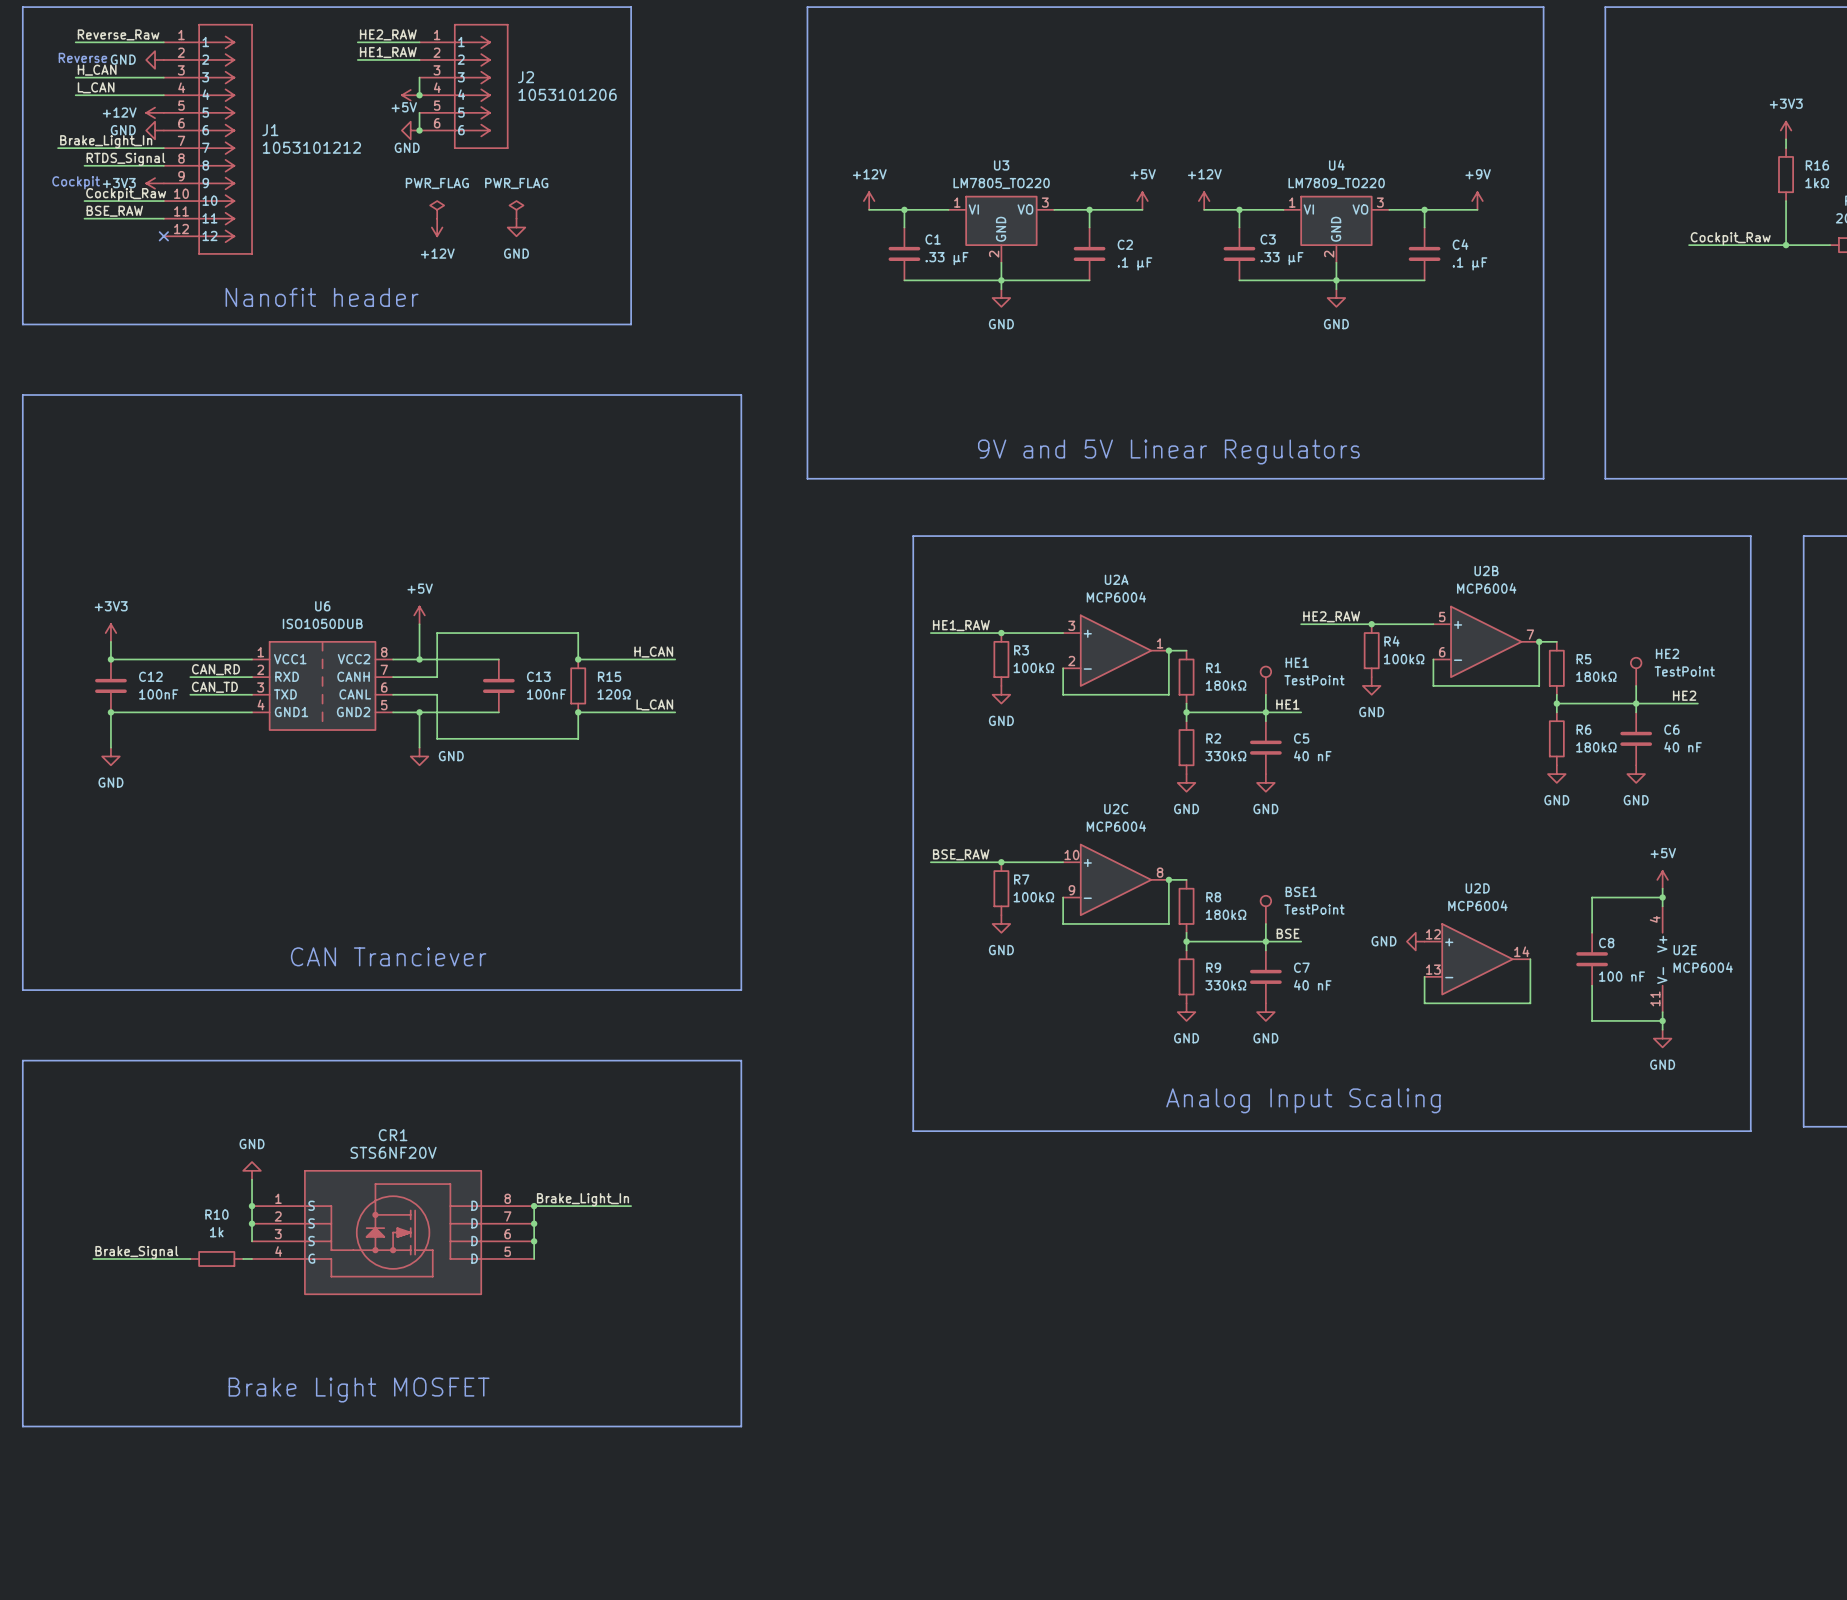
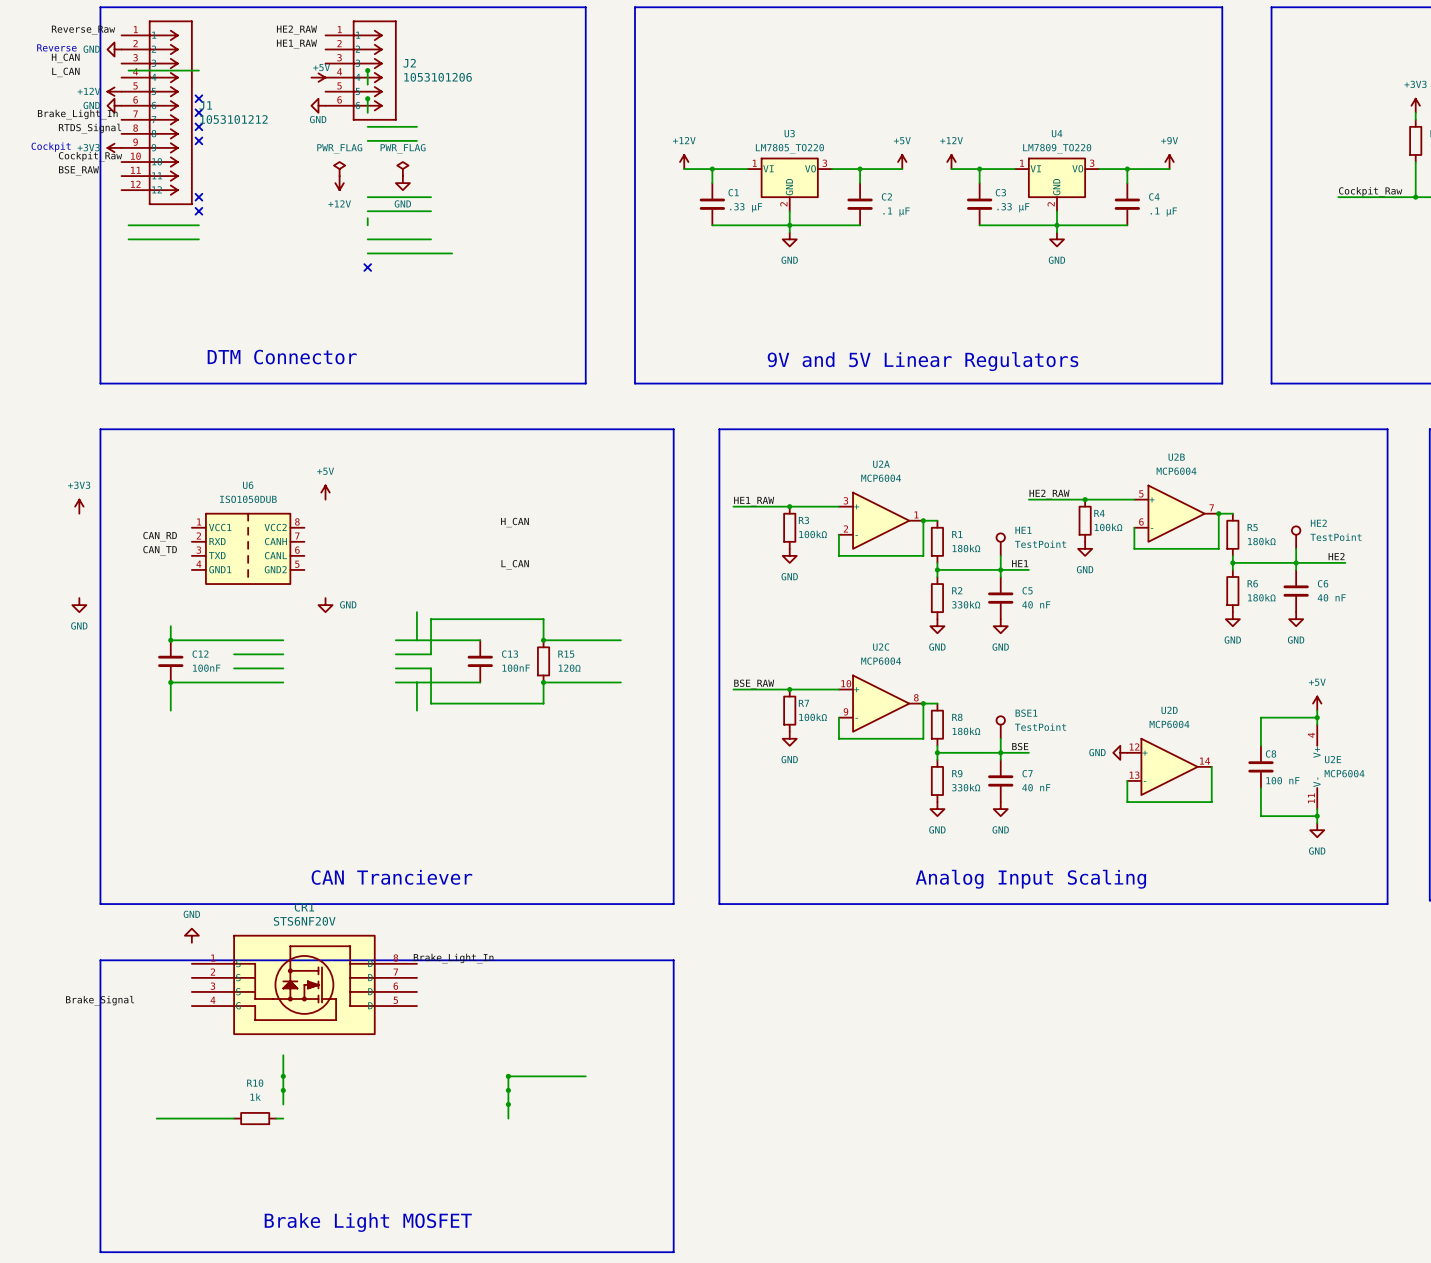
line: (137, 7) (22, 7) (22, 324) (631, 324) (631, 7) -> (100, 7) (100, 383) (585, 383) (585, 7) (494, 7)
wire: (75, 42) (163, 42) -> none
wire: (357, 42) (419, 42) -> (367, 126) (416, 126)
wire: (357, 59) (419, 59) -> (367, 140) (416, 140)
wire: (75, 77) (163, 77) -> (128, 70) (198, 70)
wire: (419, 77) (419, 95) -> (367, 70) (367, 84)
junction: none -> (367, 70)
wire: (75, 95) (163, 95) -> none
power symbol rotation: 0° (410, 95) -> 180° (318, 77)
junction: (419, 95) -> none
wire: (419, 112) (419, 130) -> (367, 98) (367, 112)
no-connect mark: none -> (198, 98)
junction: none -> (367, 98)
junction: (419, 130) -> none
no-connect mark: none -> (198, 112)
wire: (58, 148) (163, 148) -> none
no-connect mark: none -> (198, 126)
wire: (84, 165) (163, 165) -> none
no-connect mark: none -> (198, 140)
wire: (84, 201) (163, 201) -> none
wire: (84, 218) (163, 218) -> none
no-connect mark: (163, 236) -> none
no-connect mark: none -> (198, 197)
wire: none -> (367, 197) (431, 197)
no-connect mark: none -> (198, 211)
wire: none -> (367, 211) (431, 211)
wire: none -> (367, 218) (367, 225)
wire: none -> (128, 225) (198, 225)
text: Nanofit header (322, 297) -> none
wire: none -> (128, 239) (198, 239)
wire: none -> (367, 239) (431, 239)
wire: none -> (367, 253) (452, 253)
no-connect mark: none -> (367, 267)
line: (22, 395) (22, 990) (741, 990) (741, 395) (22, 395) -> none
text: none -> DTM Connector (282, 357)
line: none -> (100, 429) (100, 904) (673, 904) (673, 429) (100, 429)
wire: (419, 624) (419, 659) -> none
wire: (110, 641) (110, 659) (252, 659) -> none
junction: (110, 659) -> none
wire: (393, 659) (498, 659) -> none
junction: (419, 659) -> none
junction: (578, 659) -> none
wire: (675, 659) (578, 659) (578, 633) (437, 633) (437, 677) (393, 677) -> none
wire: (190, 677) (252, 677) -> none
C12 position: (110, 685) -> (170, 661)
C13 position: (498, 685) -> (480, 661)
R15 position: (578, 685) -> (543, 661)
wire: (190, 694) (252, 694) -> (234, 654) (283, 654)
wire: (393, 694) (437, 694) (437, 738) (578, 738) (578, 712) (675, 712) -> none
junction: (110, 712) -> none
wire: (252, 712) (110, 712) (110, 747) -> none
wire: (393, 712) (498, 712) -> (395, 640) (480, 640)
wire: (419, 712) (419, 747) -> (416, 612) (416, 640)
junction: (419, 712) -> none
junction: (578, 712) -> none
wire: none -> (170, 626) (170, 640) (283, 640)
junction: none -> (170, 640)
junction: none -> (543, 640)
wire: none -> (620, 640) (543, 640) (543, 619) (431, 619) (431, 654) (395, 654)
wire: none -> (234, 668) (283, 668)
wire: none -> (395, 668) (431, 668) (431, 703) (543, 703) (543, 682) (620, 682)
junction: none -> (170, 682)
wire: none -> (283, 682) (170, 682) (170, 710)
wire: none -> (395, 682) (480, 682)
wire: none -> (416, 682) (416, 710)
junction: none -> (543, 682)
text: CAN Tranciever (388, 956) -> none
line: (22, 1060) (741, 1060) (741, 1426) (22, 1426) (22, 1060) -> none
text: none -> CAN Tranciever (391, 877)
wire: (252, 1179) (252, 1241) -> none
line: none -> (100, 960) (673, 960) (673, 1252) (100, 1252) (100, 960)
junction: (252, 1206) -> none
junction: (534, 1206) -> none
wire: (631, 1206) (534, 1206) (534, 1258) -> none
junction: (252, 1223) -> none
junction: (534, 1223) -> none
junction: (534, 1241) -> none
wire: (93, 1258) (190, 1258) -> none
R10 position: (216, 1258) -> (255, 1118)
wire: (243, 1258) (252, 1258) -> none
wire: none -> (283, 1055) (283, 1104)
junction: none -> (283, 1076)
junction: none -> (508, 1076)
wire: none -> (585, 1076) (508, 1076) (508, 1118)
junction: none -> (283, 1090)
junction: none -> (508, 1090)
junction: none -> (508, 1104)
text: Brake Light MOSFET (359, 1390) -> none
wire: none -> (156, 1118) (234, 1118)
wire: none -> (276, 1118) (283, 1118)
text: none -> Brake Light MOSFET (368, 1222)

